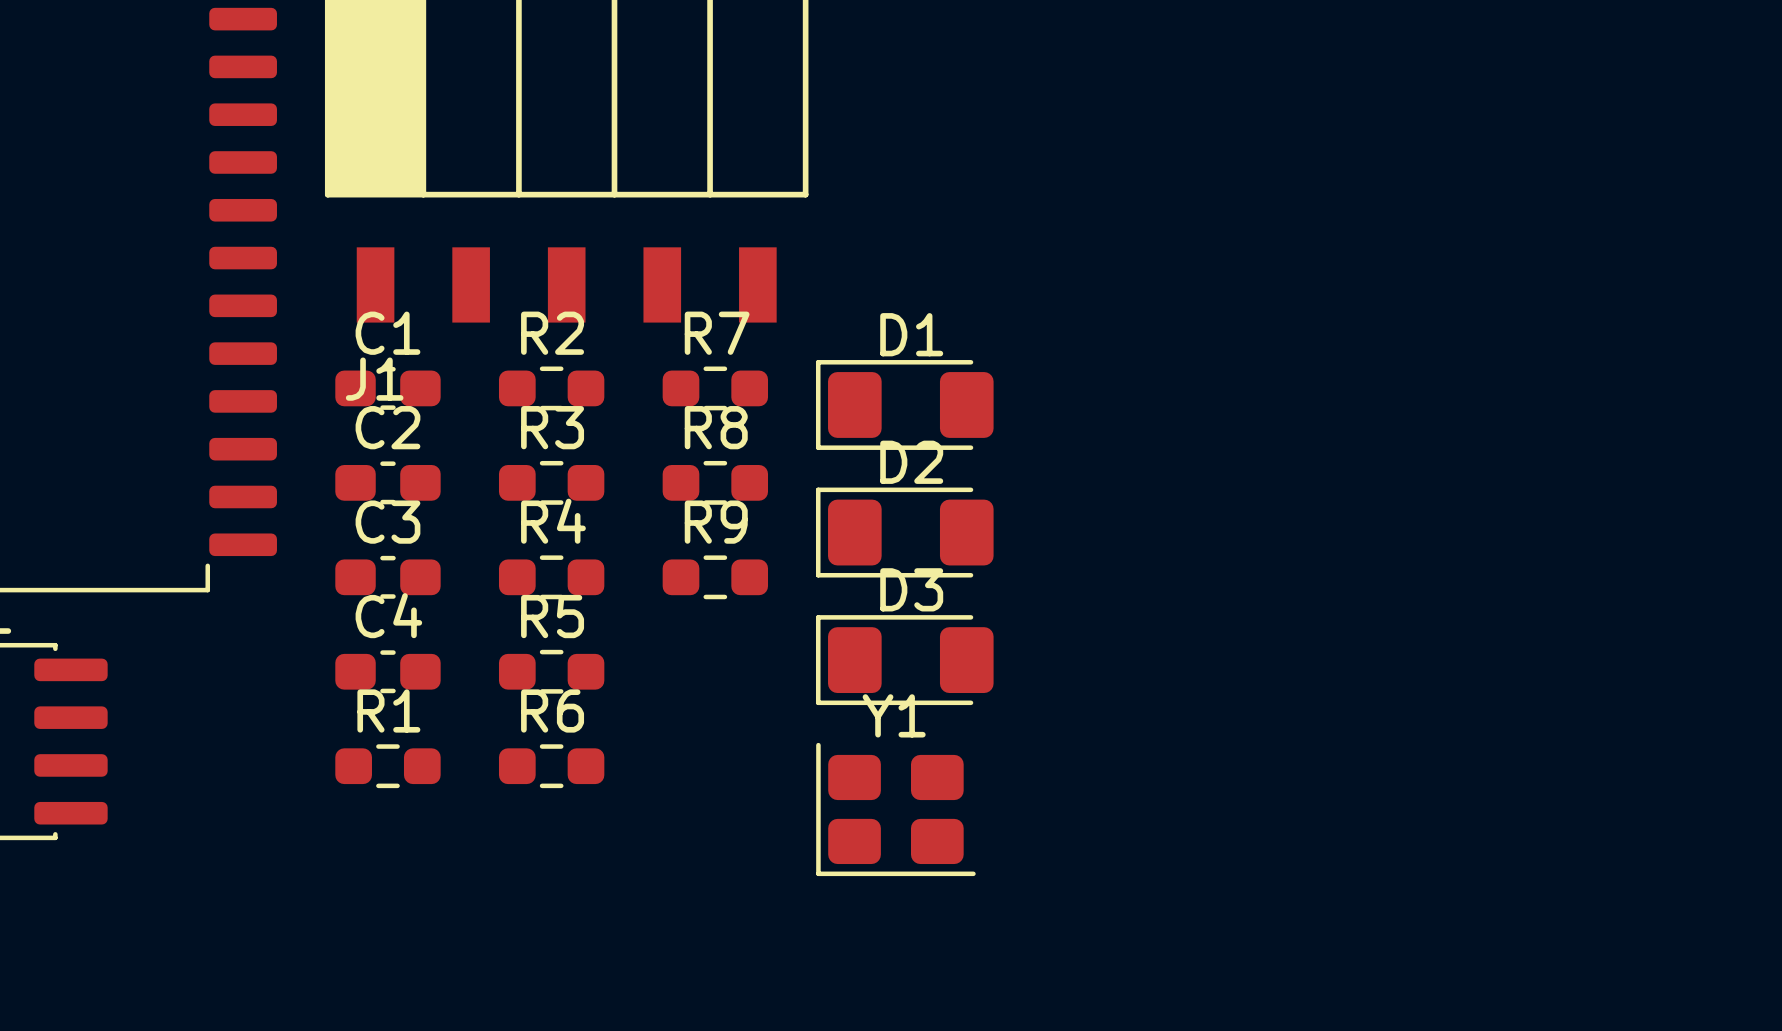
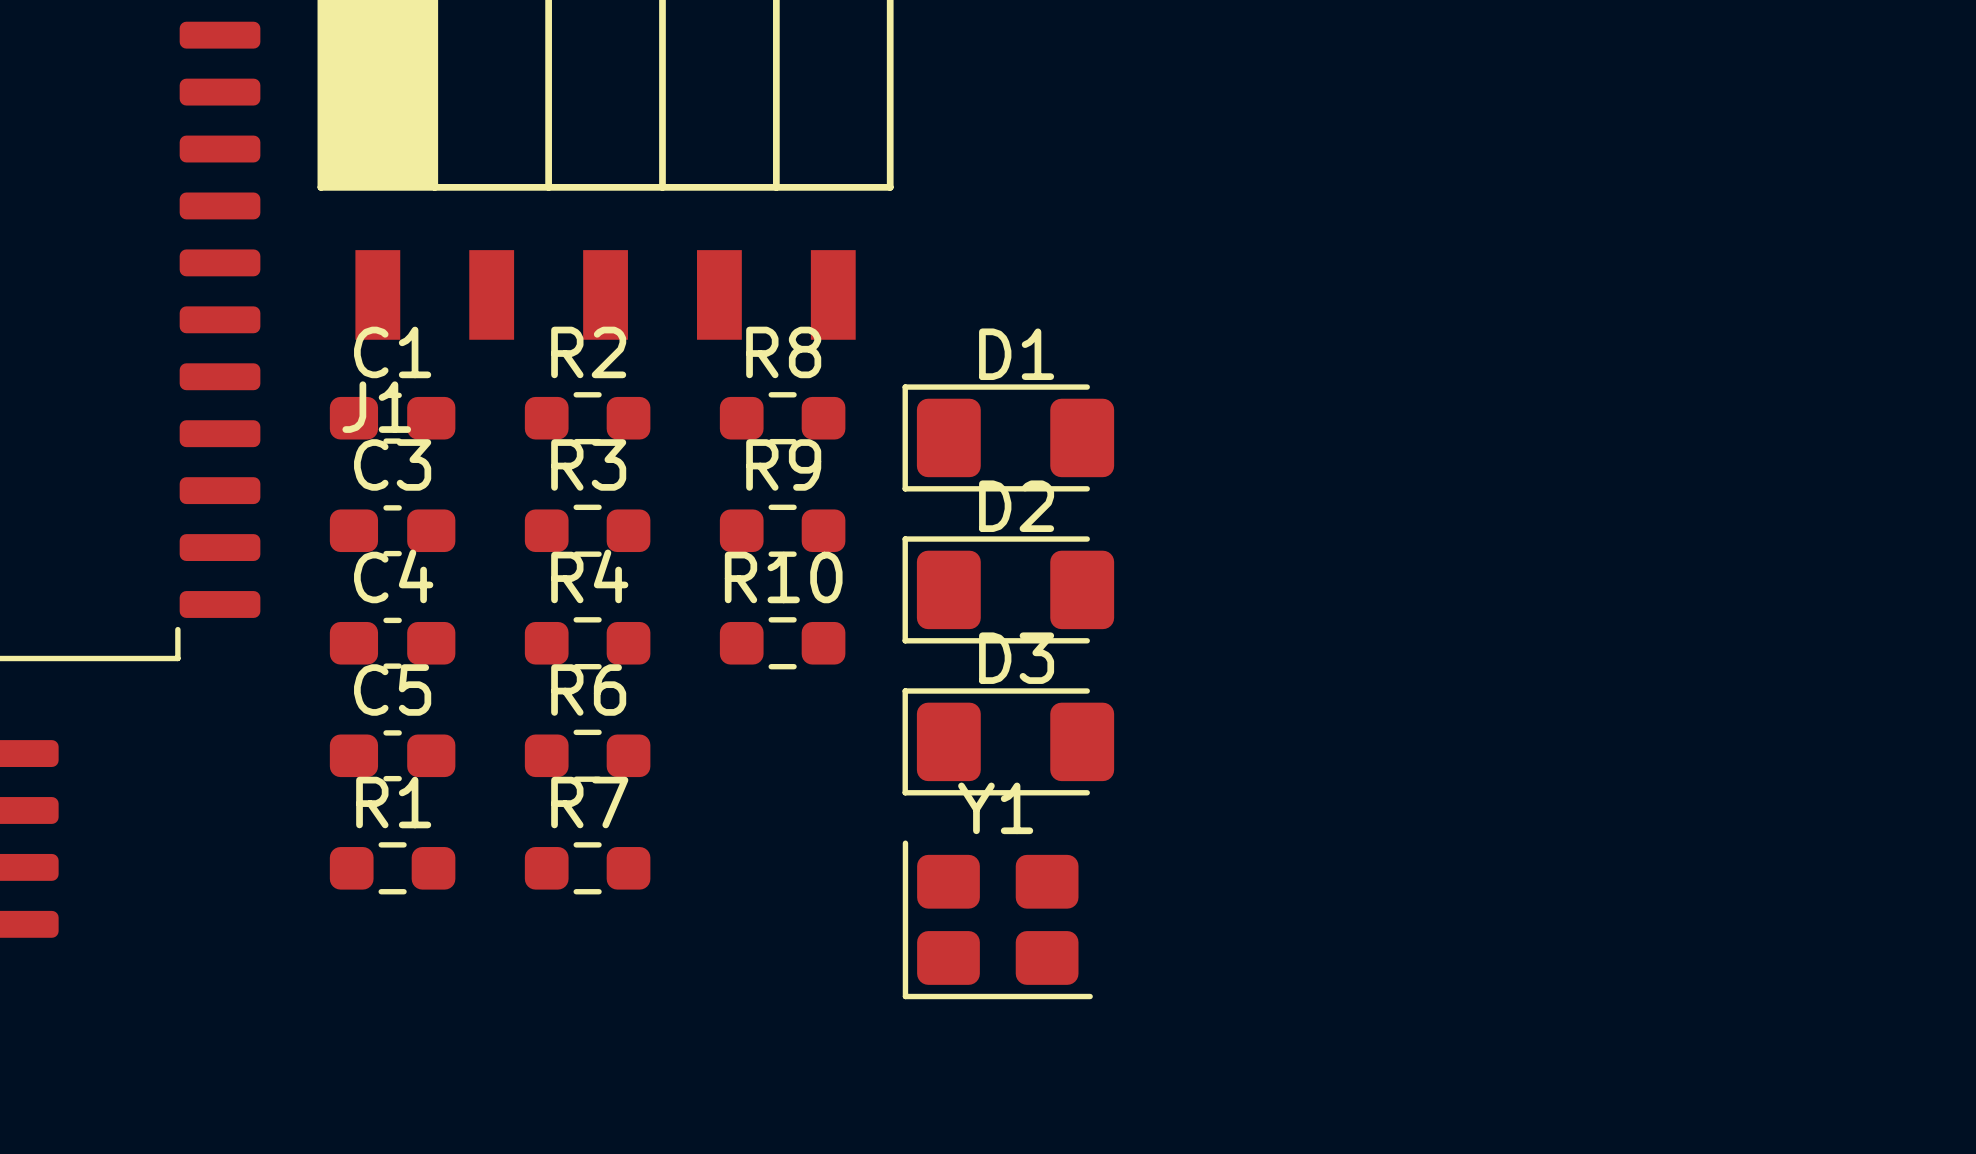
R7 name: R7 (717, 333) -> R8 (783, 352)
C2 name: C2 (387, 427) -> C3 (392, 464)
R8 name: R8 (716, 427) -> R9 (783, 464)
C3 name: C3 (387, 522) -> C4 (393, 576)
R9 name: R9 (716, 522) -> R10 (783, 577)
C4 name: C4 (388, 615) -> C5 (392, 690)
R5 name: R5 (552, 616) -> R6 (588, 690)
R6 name: R6 (552, 710) -> R7 (589, 802)

